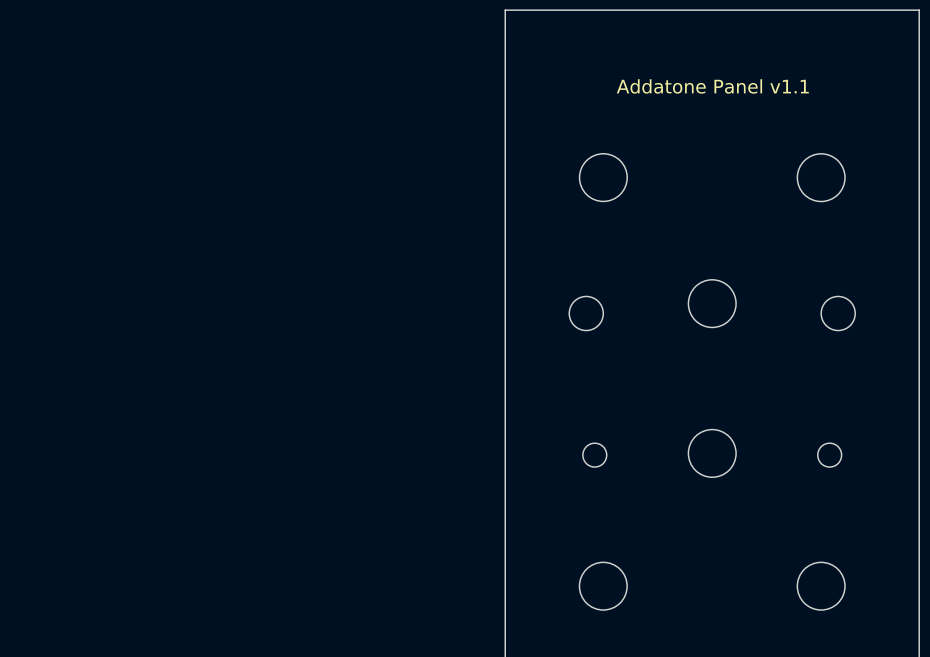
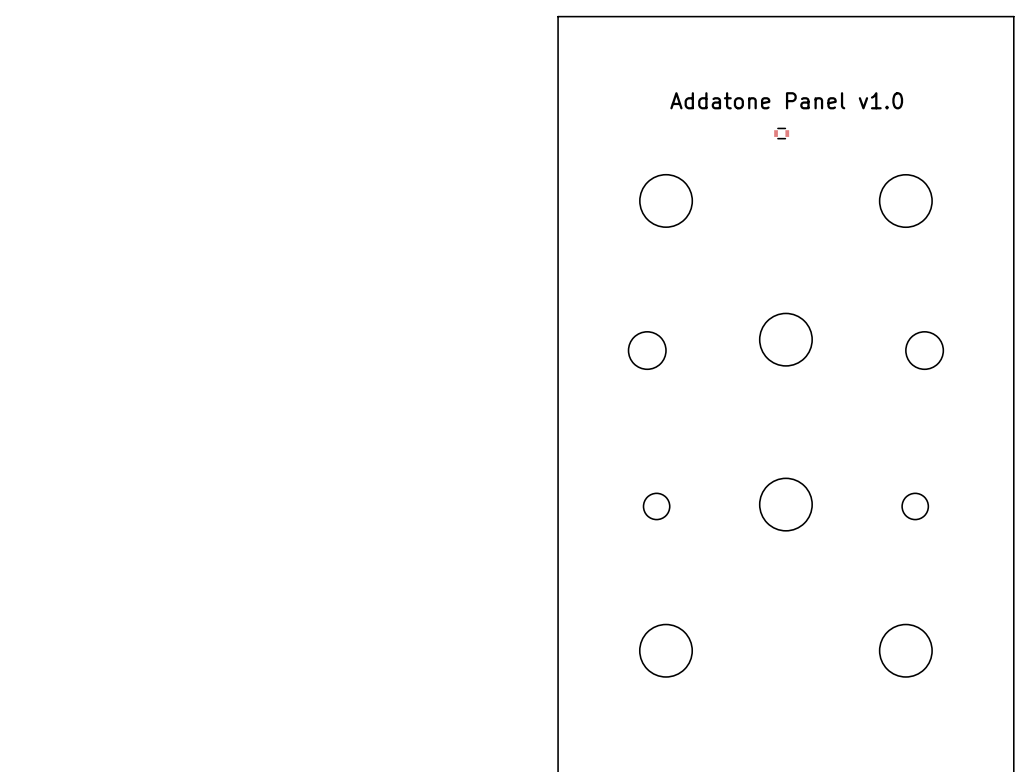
text: Addatone Panel v1.1 (712, 86) -> Addatone Panel v1.0 (786, 100)
part: none -> (781, 133)

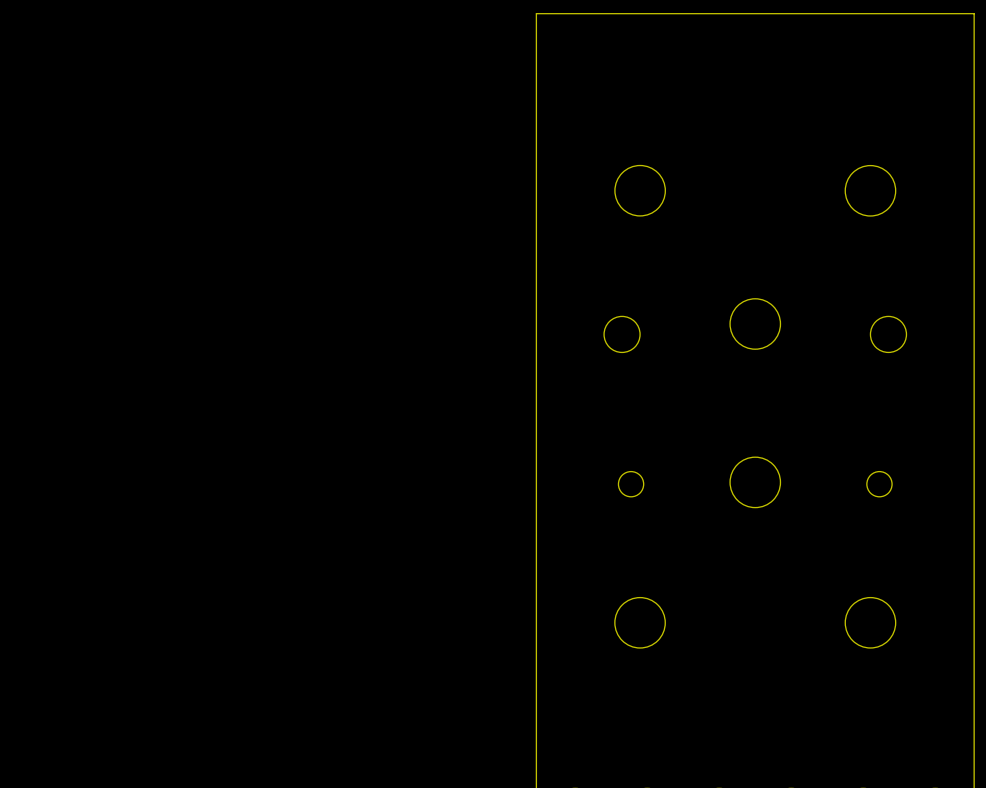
text: Addatone Panel v1.0 (786, 100) -> none
part: (781, 133) -> none

